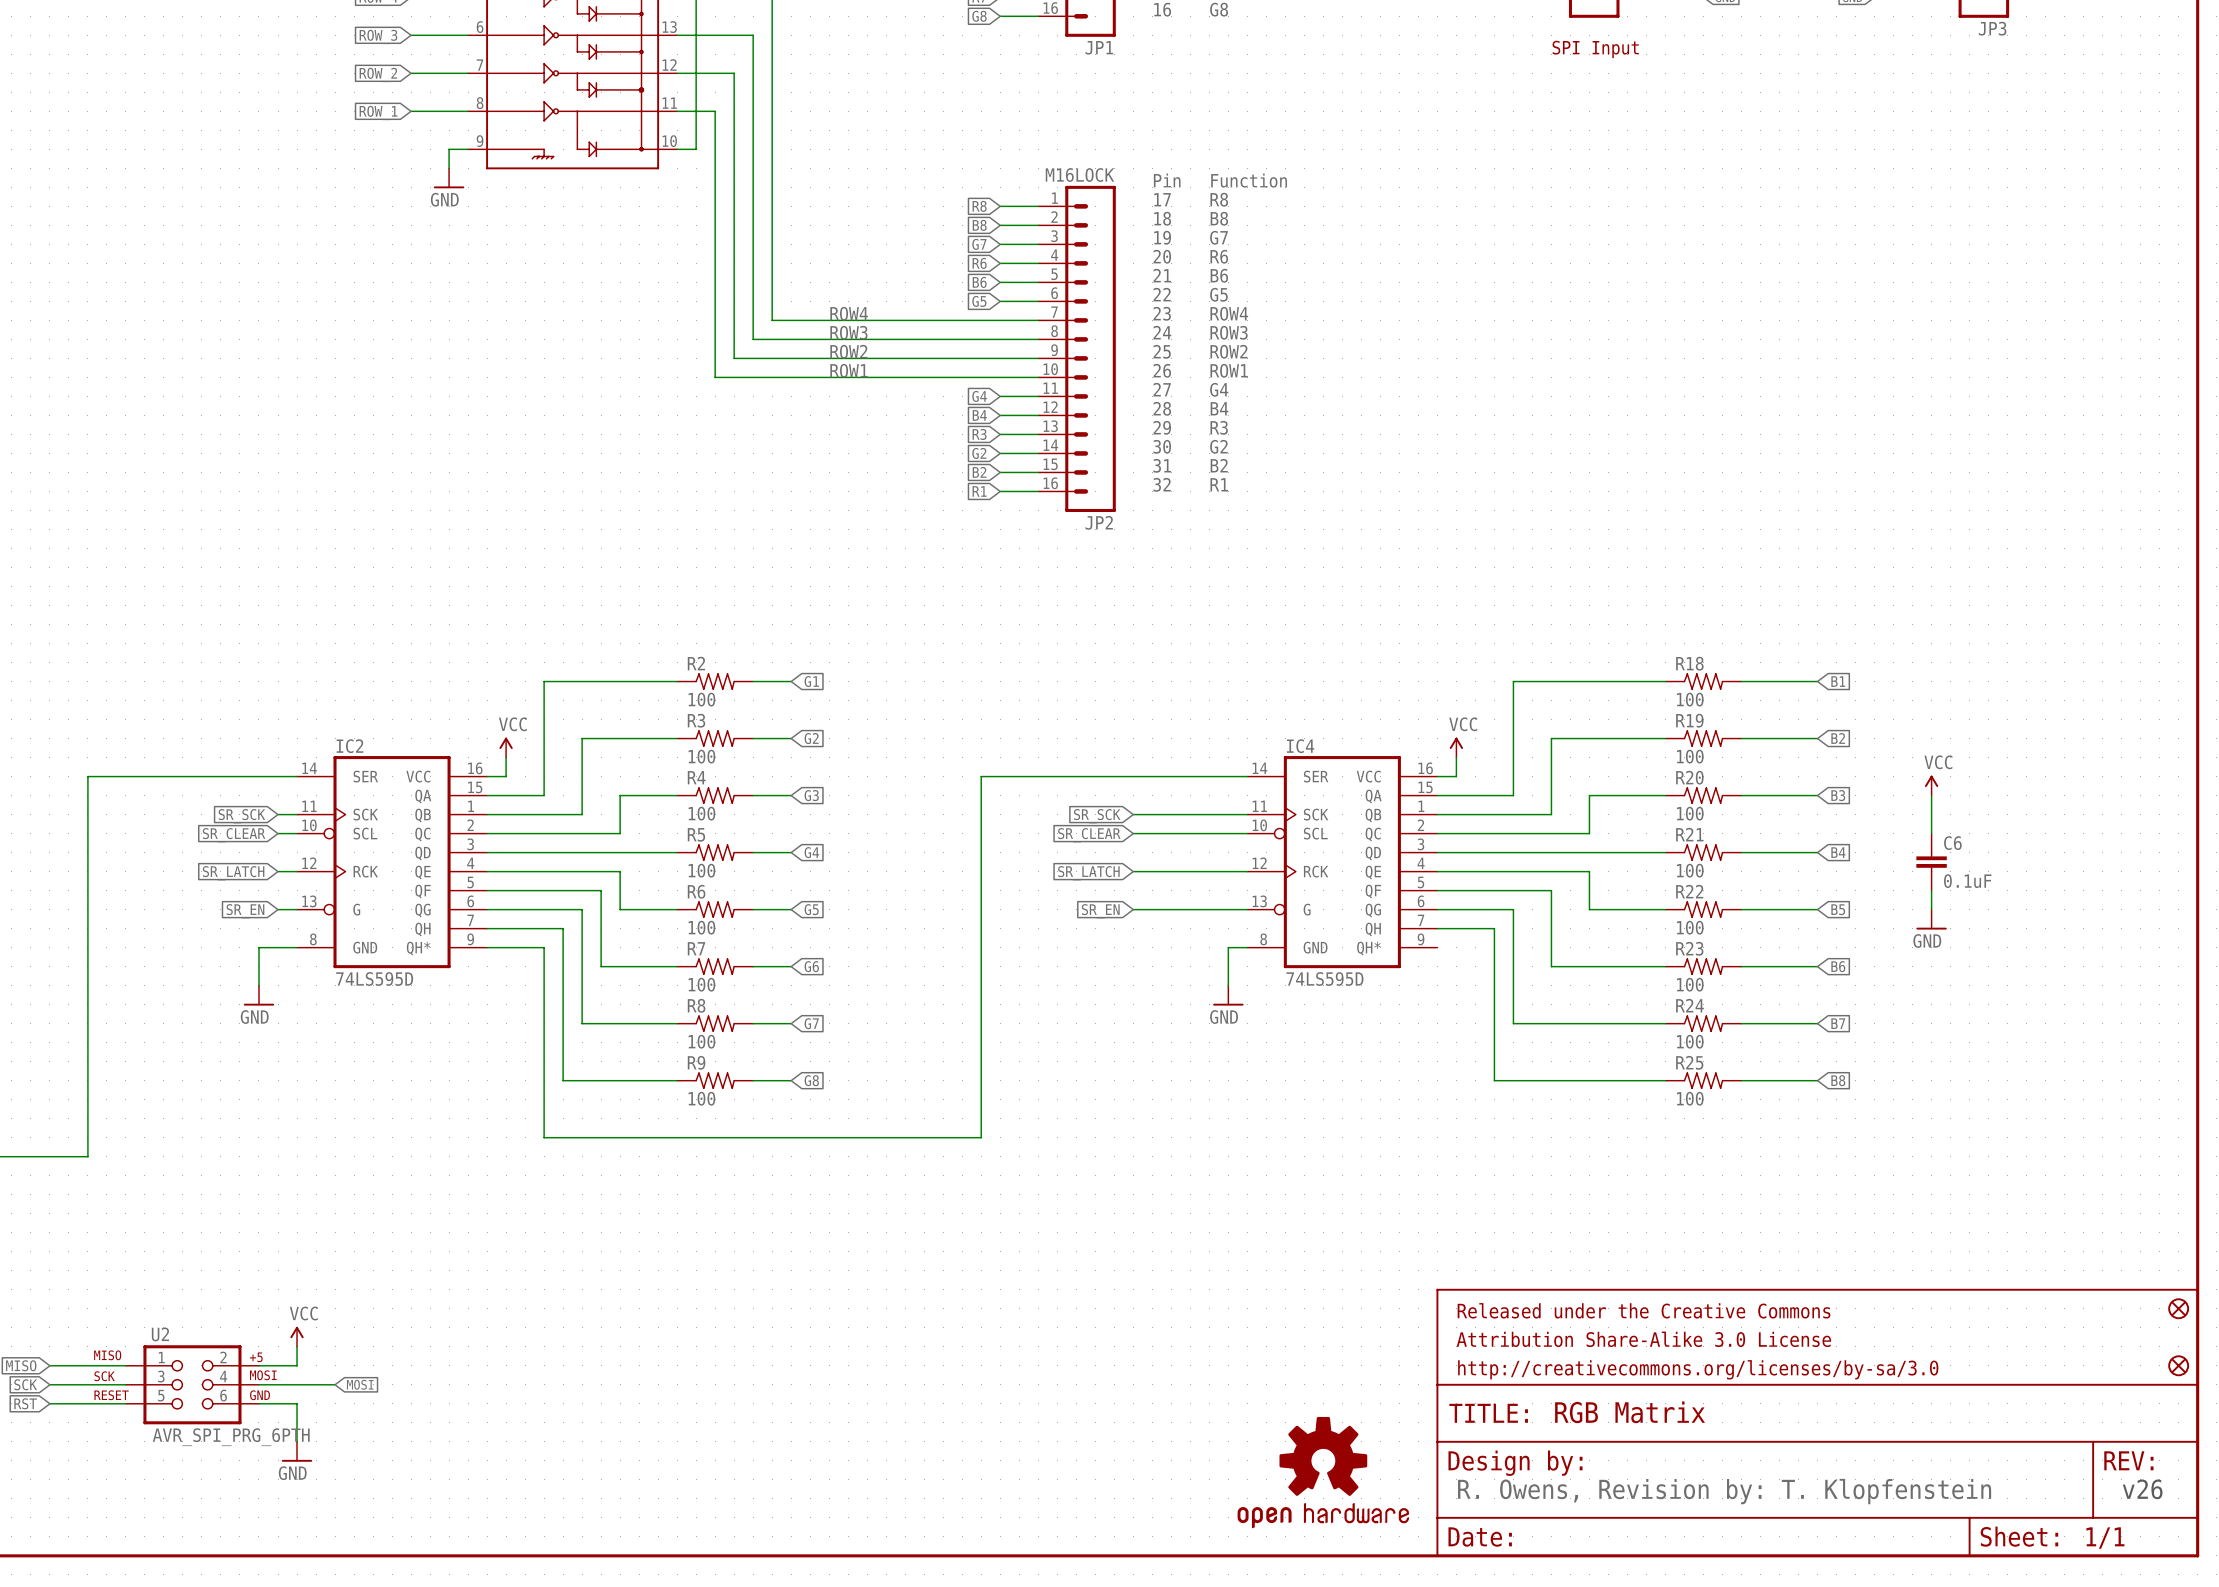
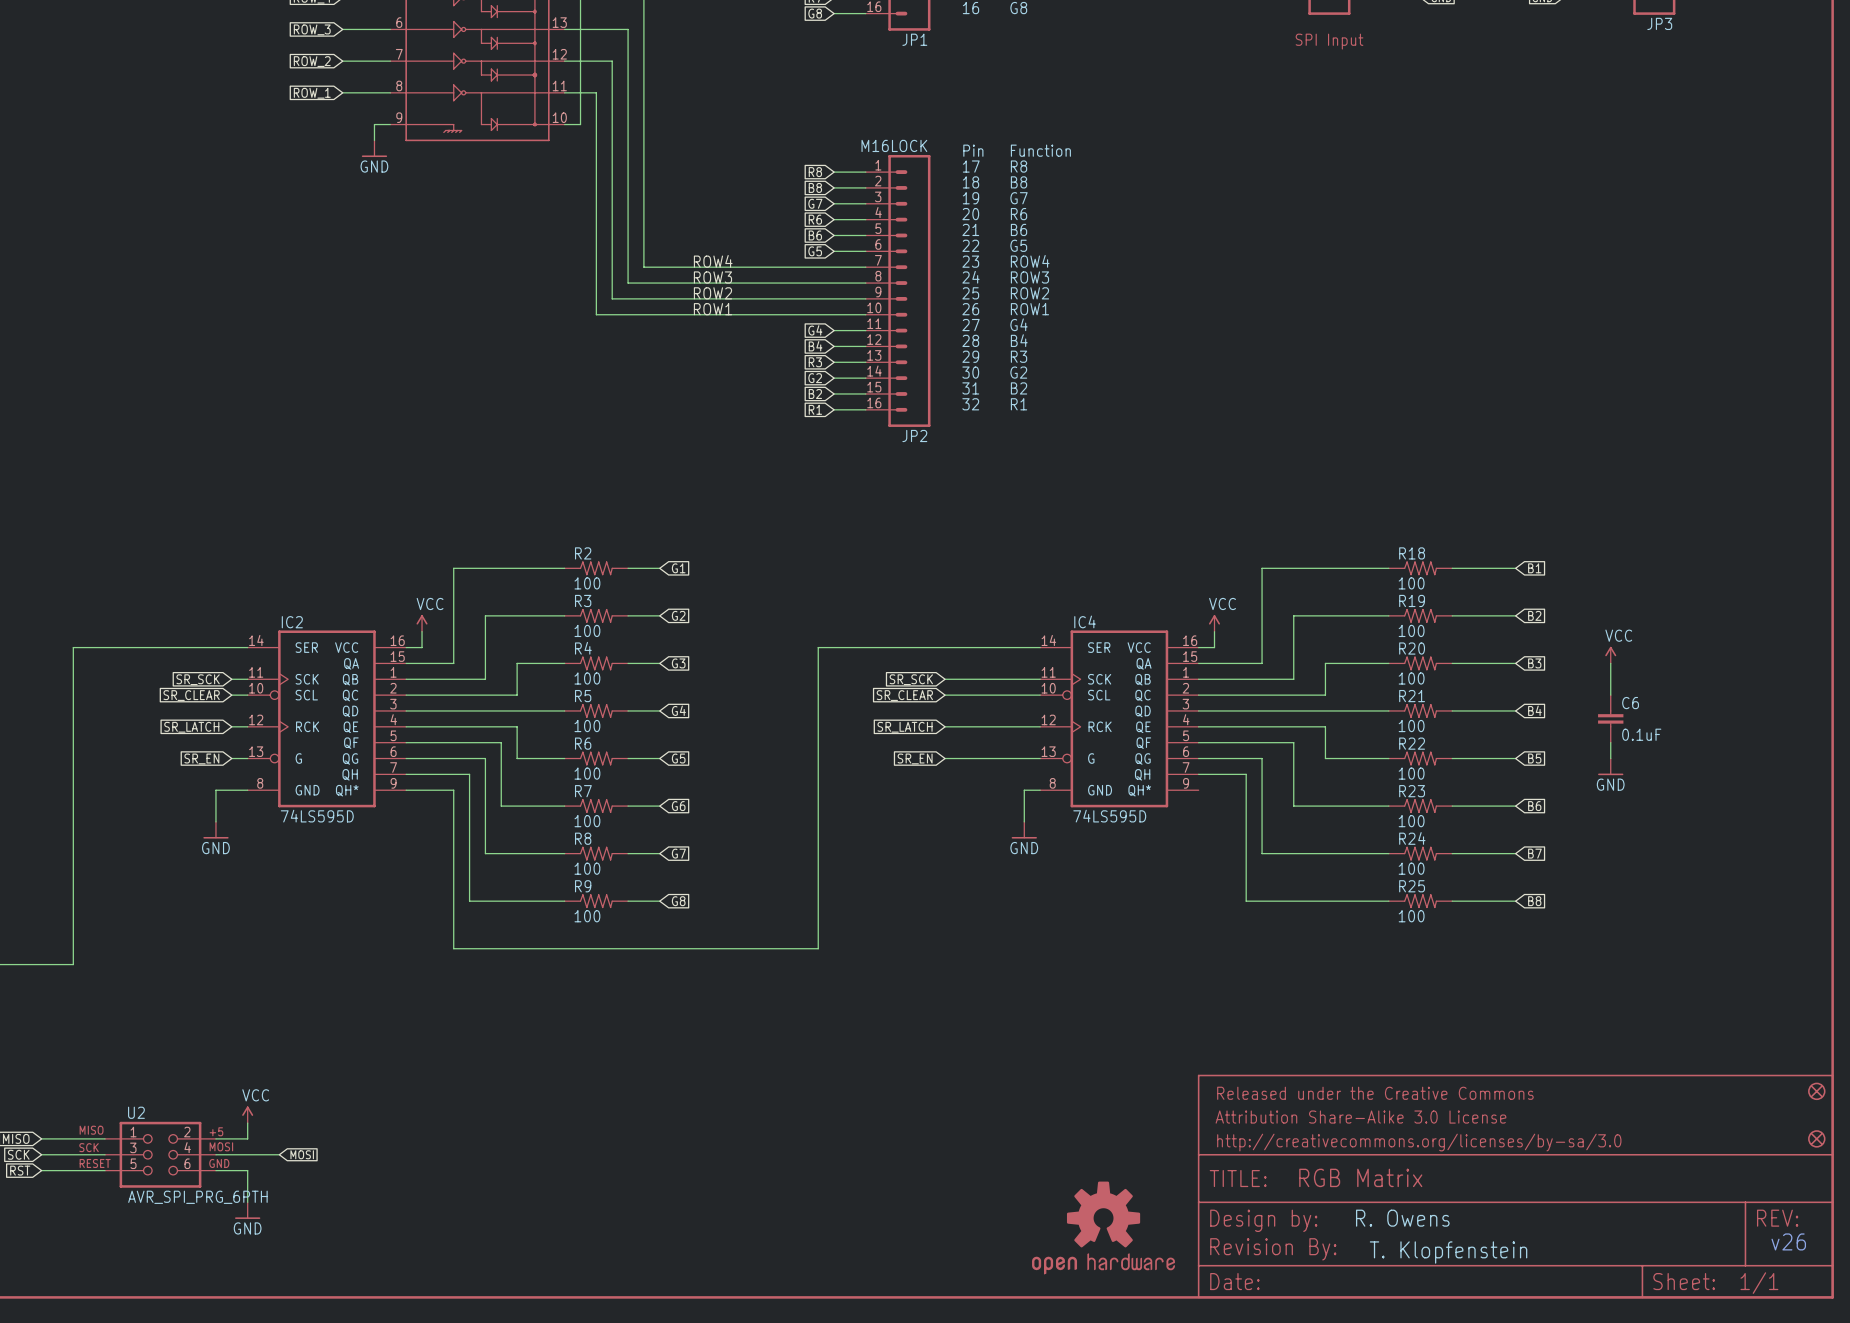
text: none -> R. Owens (1402, 1218)
text: R. Owens, Revision by: T. Klopfenstein (1724, 1491) -> none
part: none -> (1273, 1249)
text: none -> T. Klopfenstein (1448, 1252)

